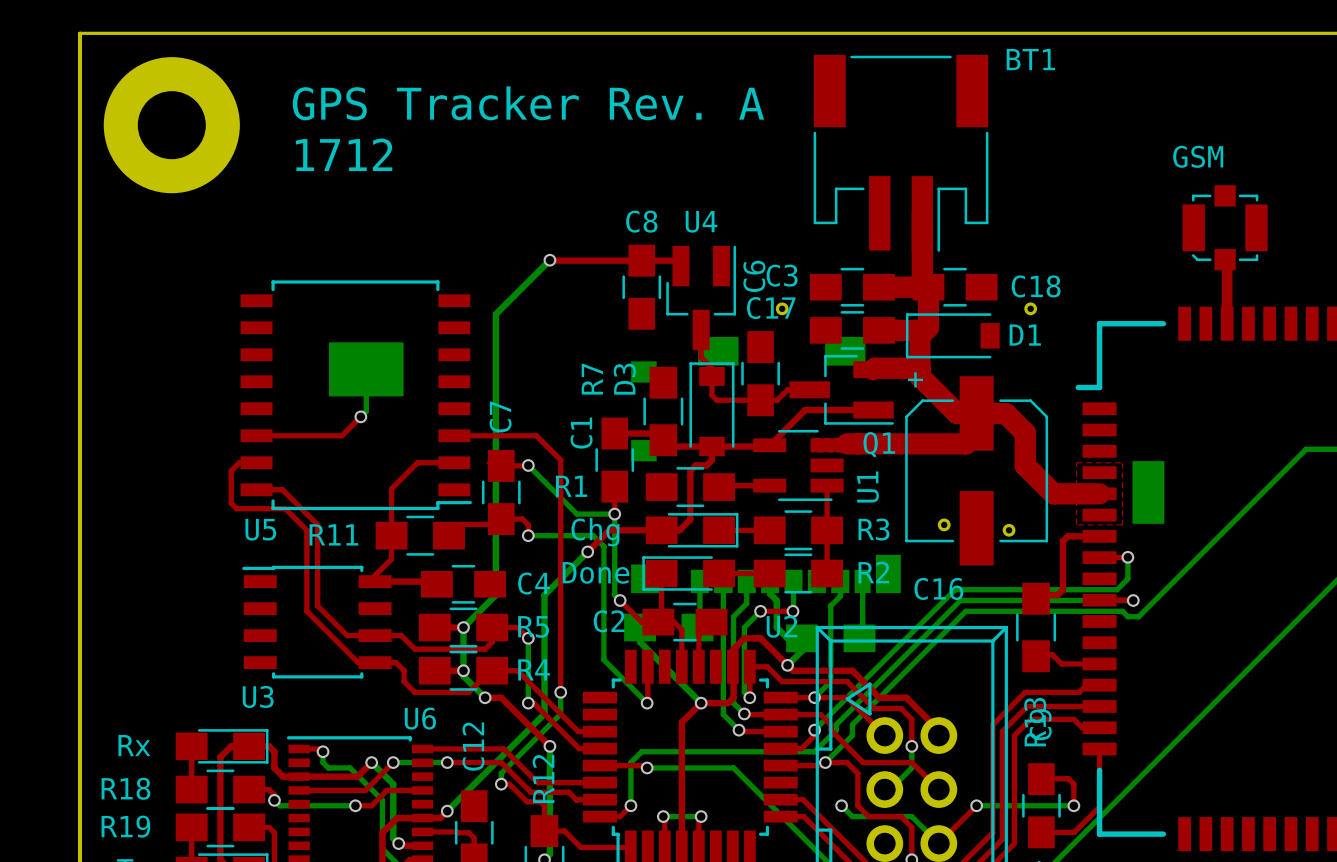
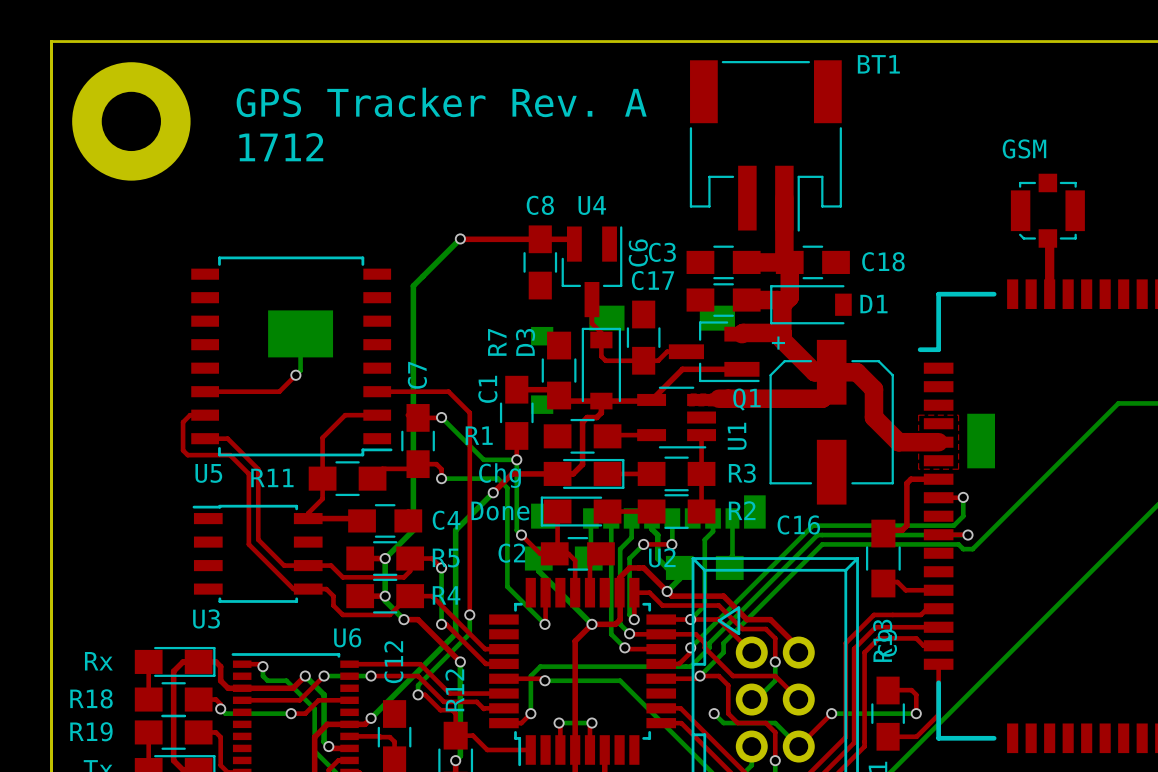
part: (782, 308) -> none
part: (1030, 308) -> none
part: (944, 524) -> none
part: (1009, 530) -> none

